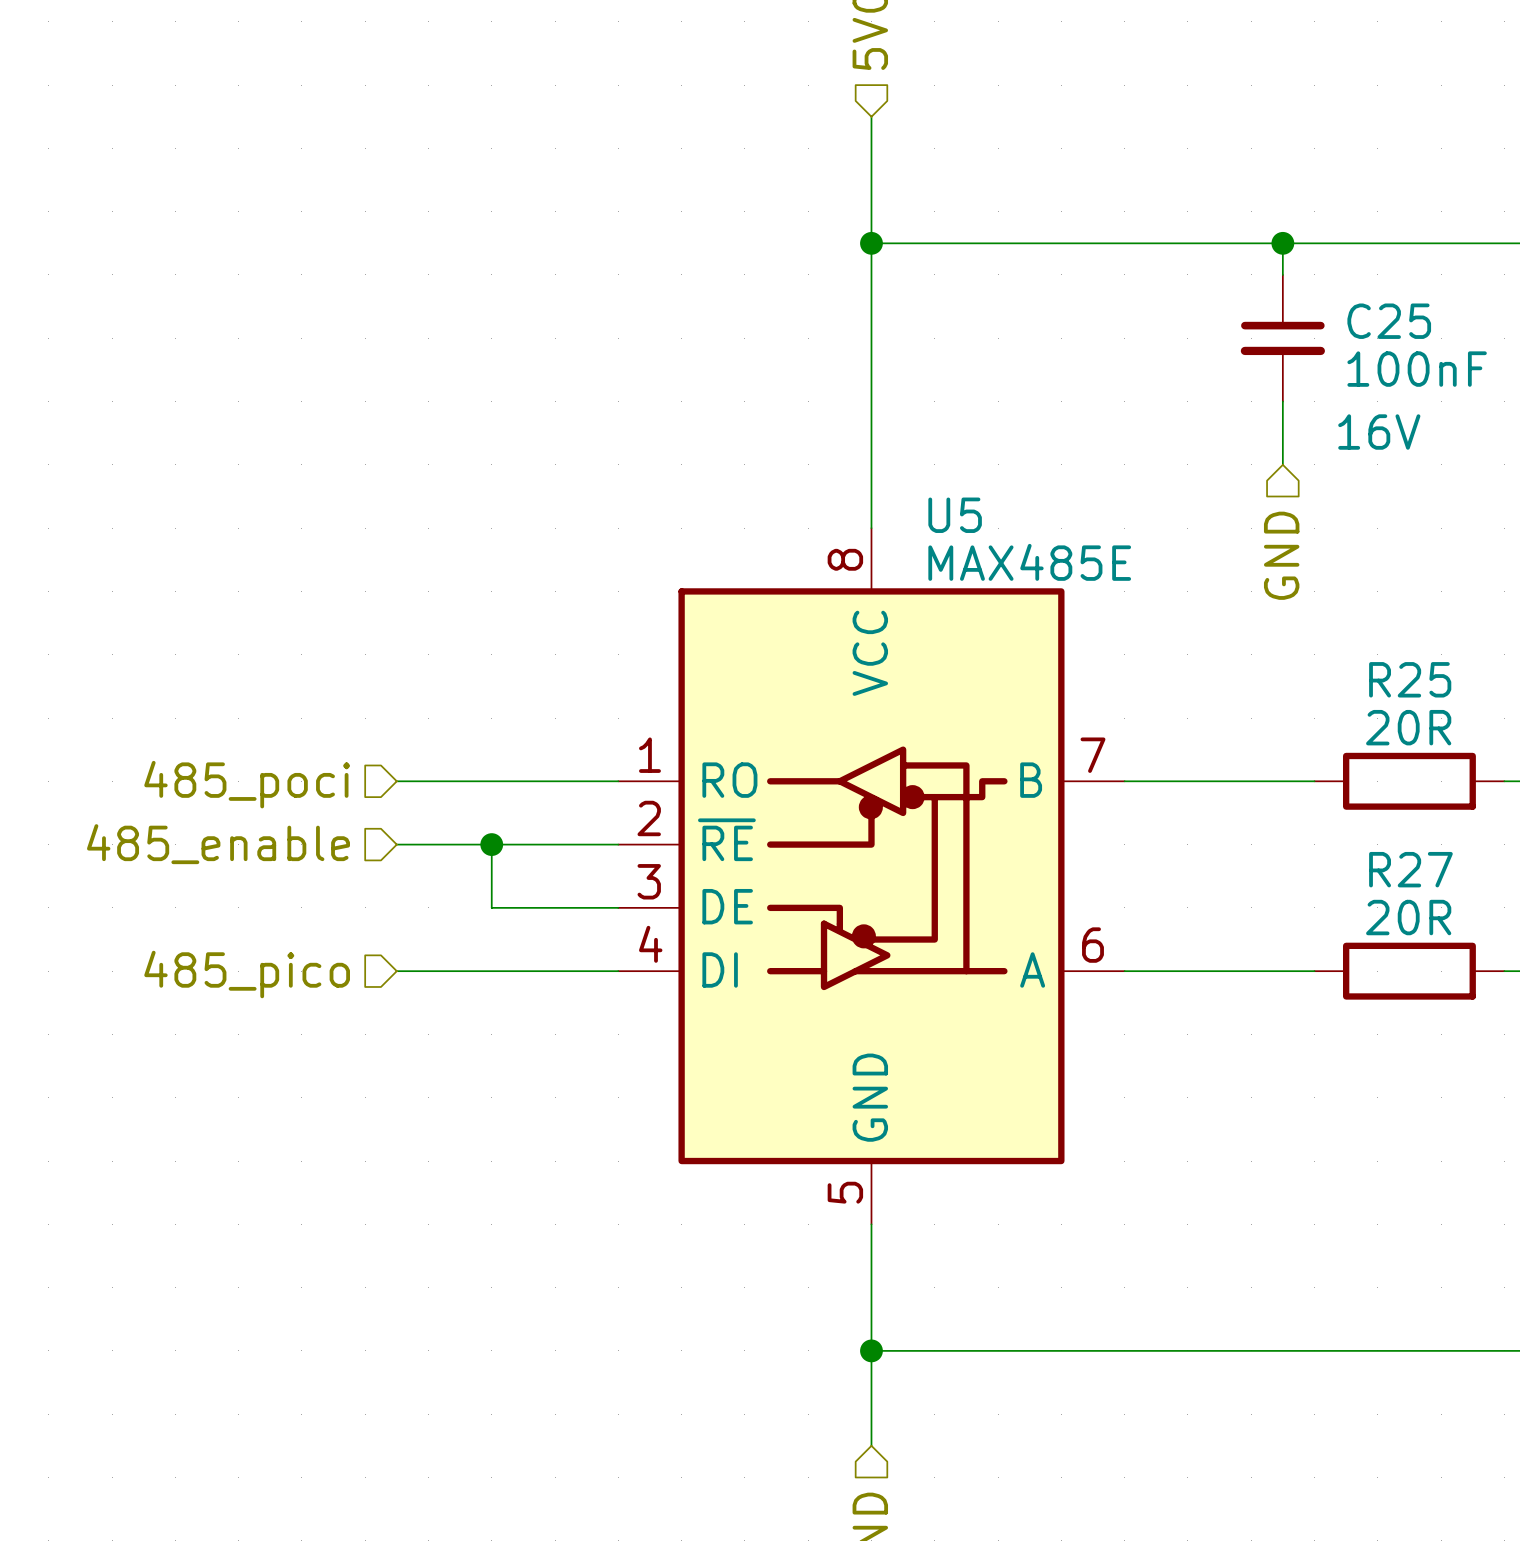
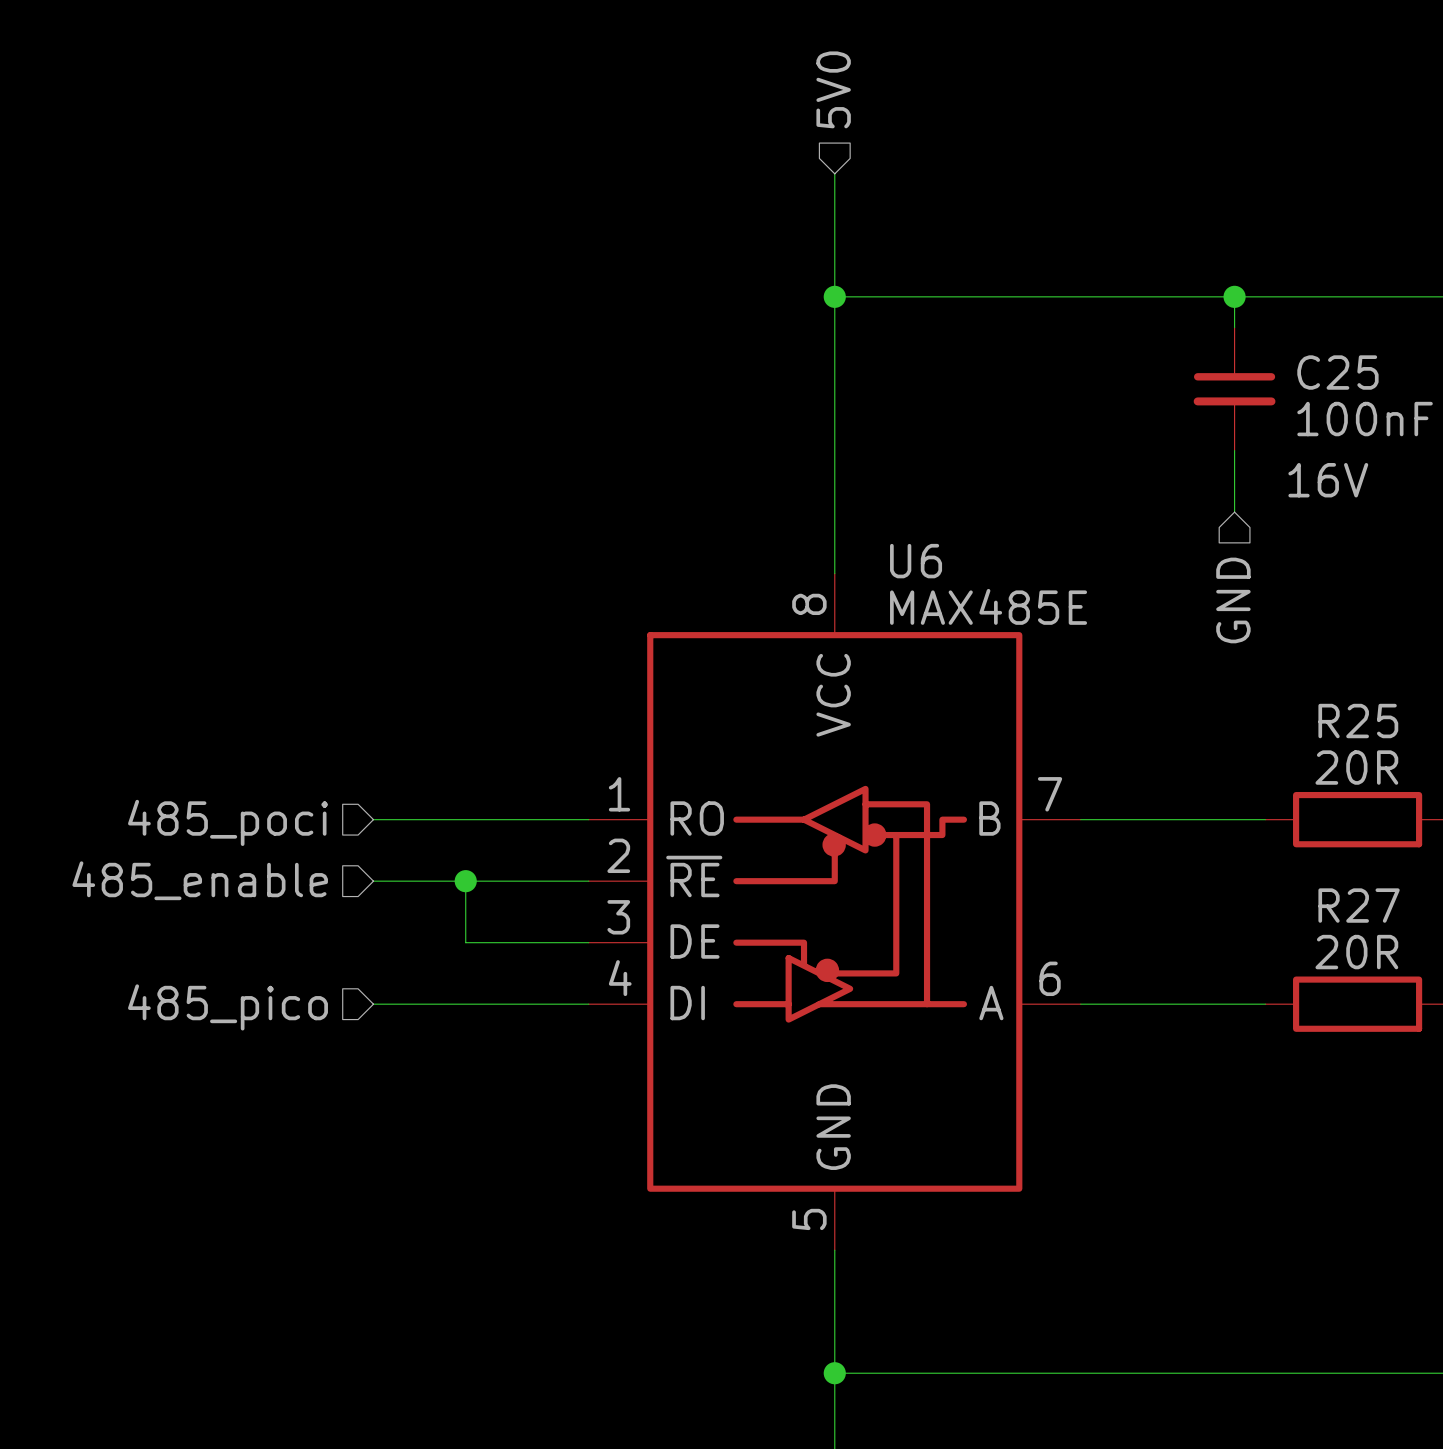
U5 name: U5 (955, 515) -> U6 (916, 561)

